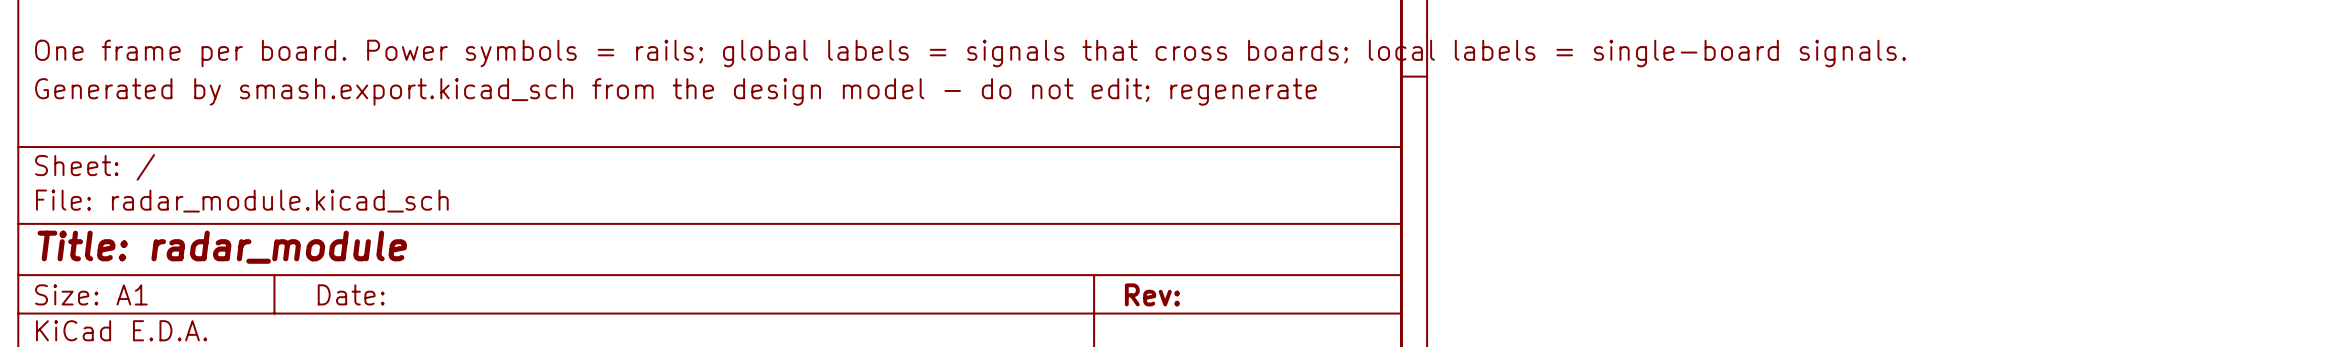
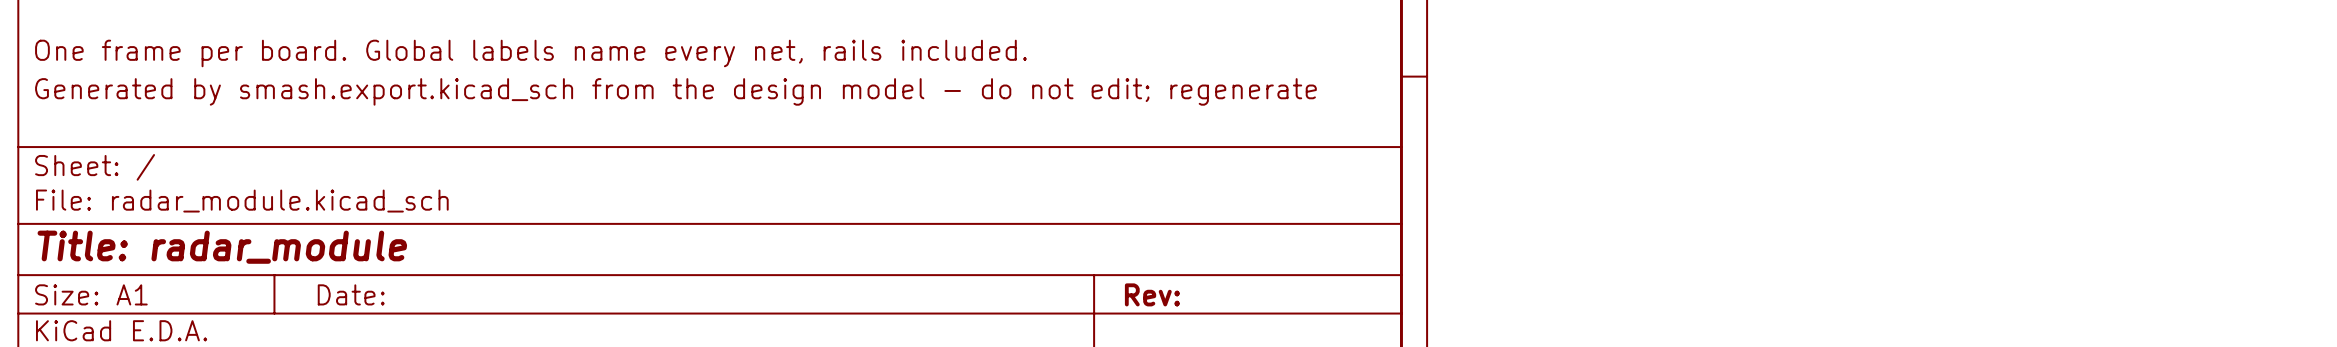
title block: One frame per board. Power symbols = rails; global labels = signals that cross boards; local labels = single-board signals. (970, 53) -> One frame per board. Global labels name every net, rails included. (530, 53)

